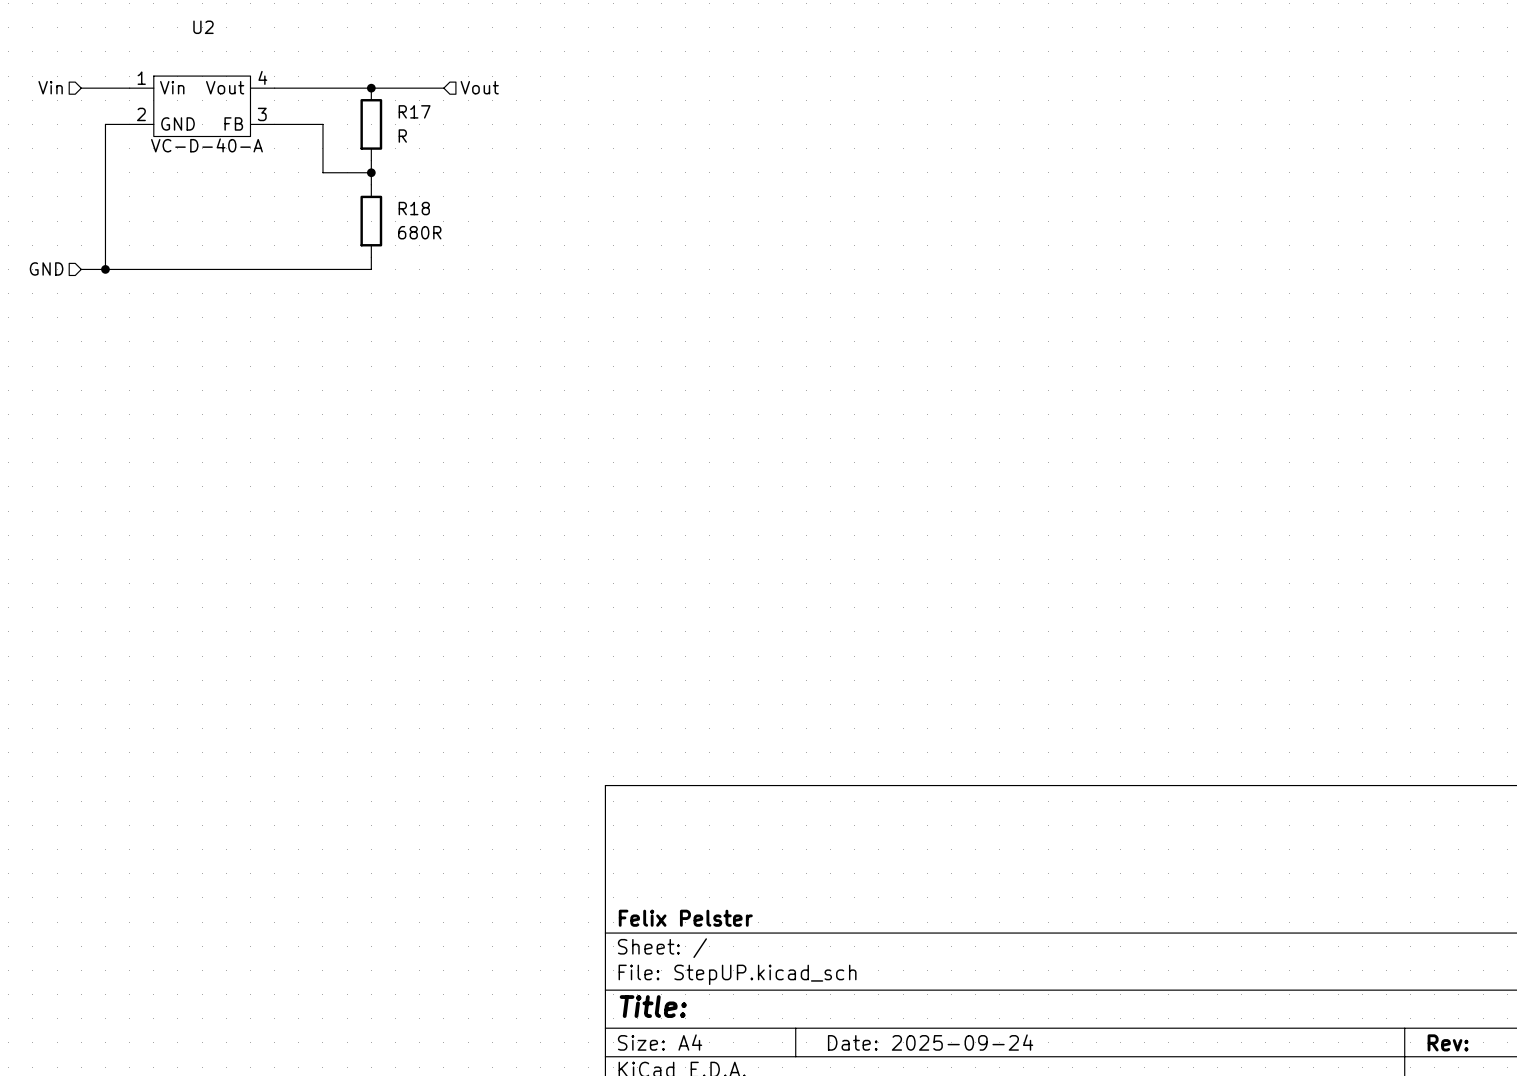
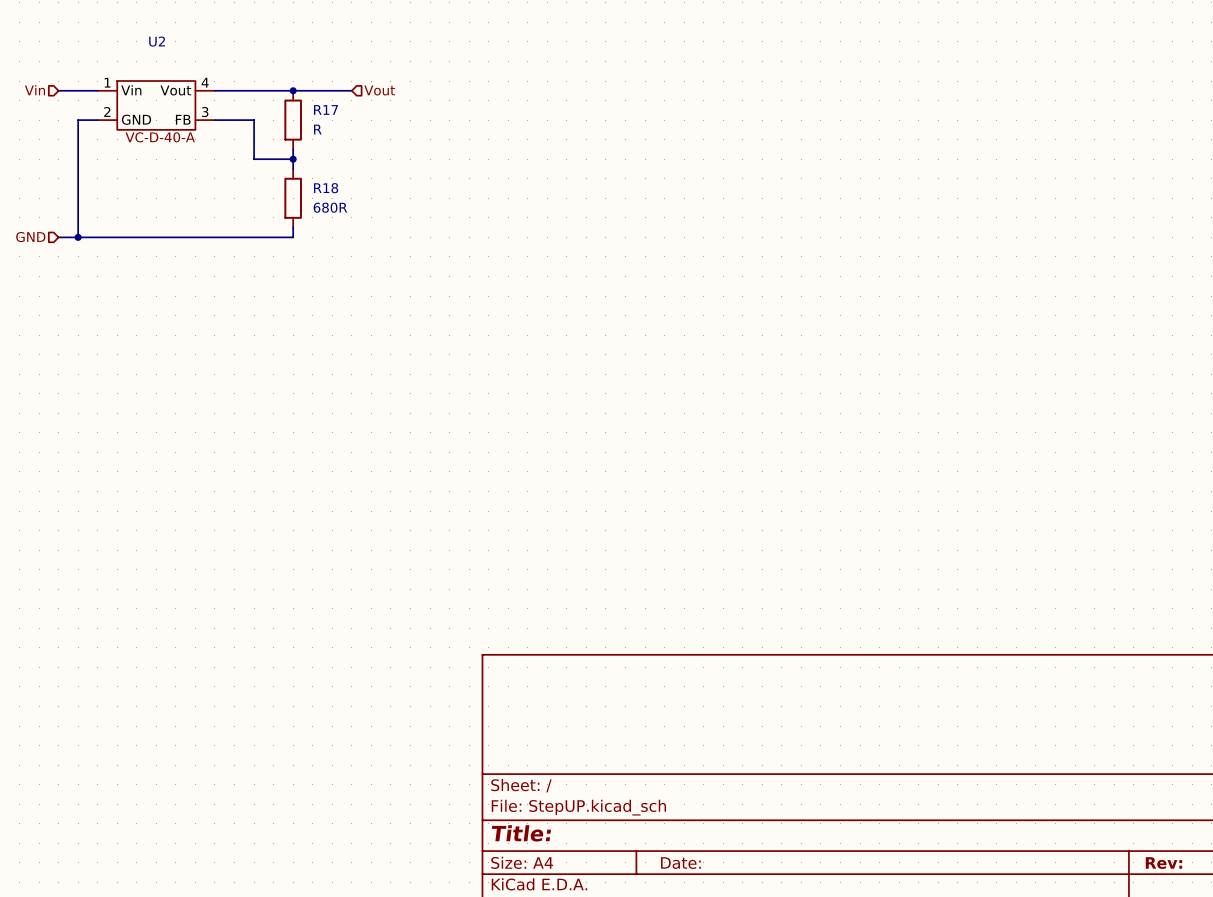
title block: Felix Pelster (685, 918) -> none
title block: Date: 2025-09-24 (930, 1042) -> Date: (680, 863)

